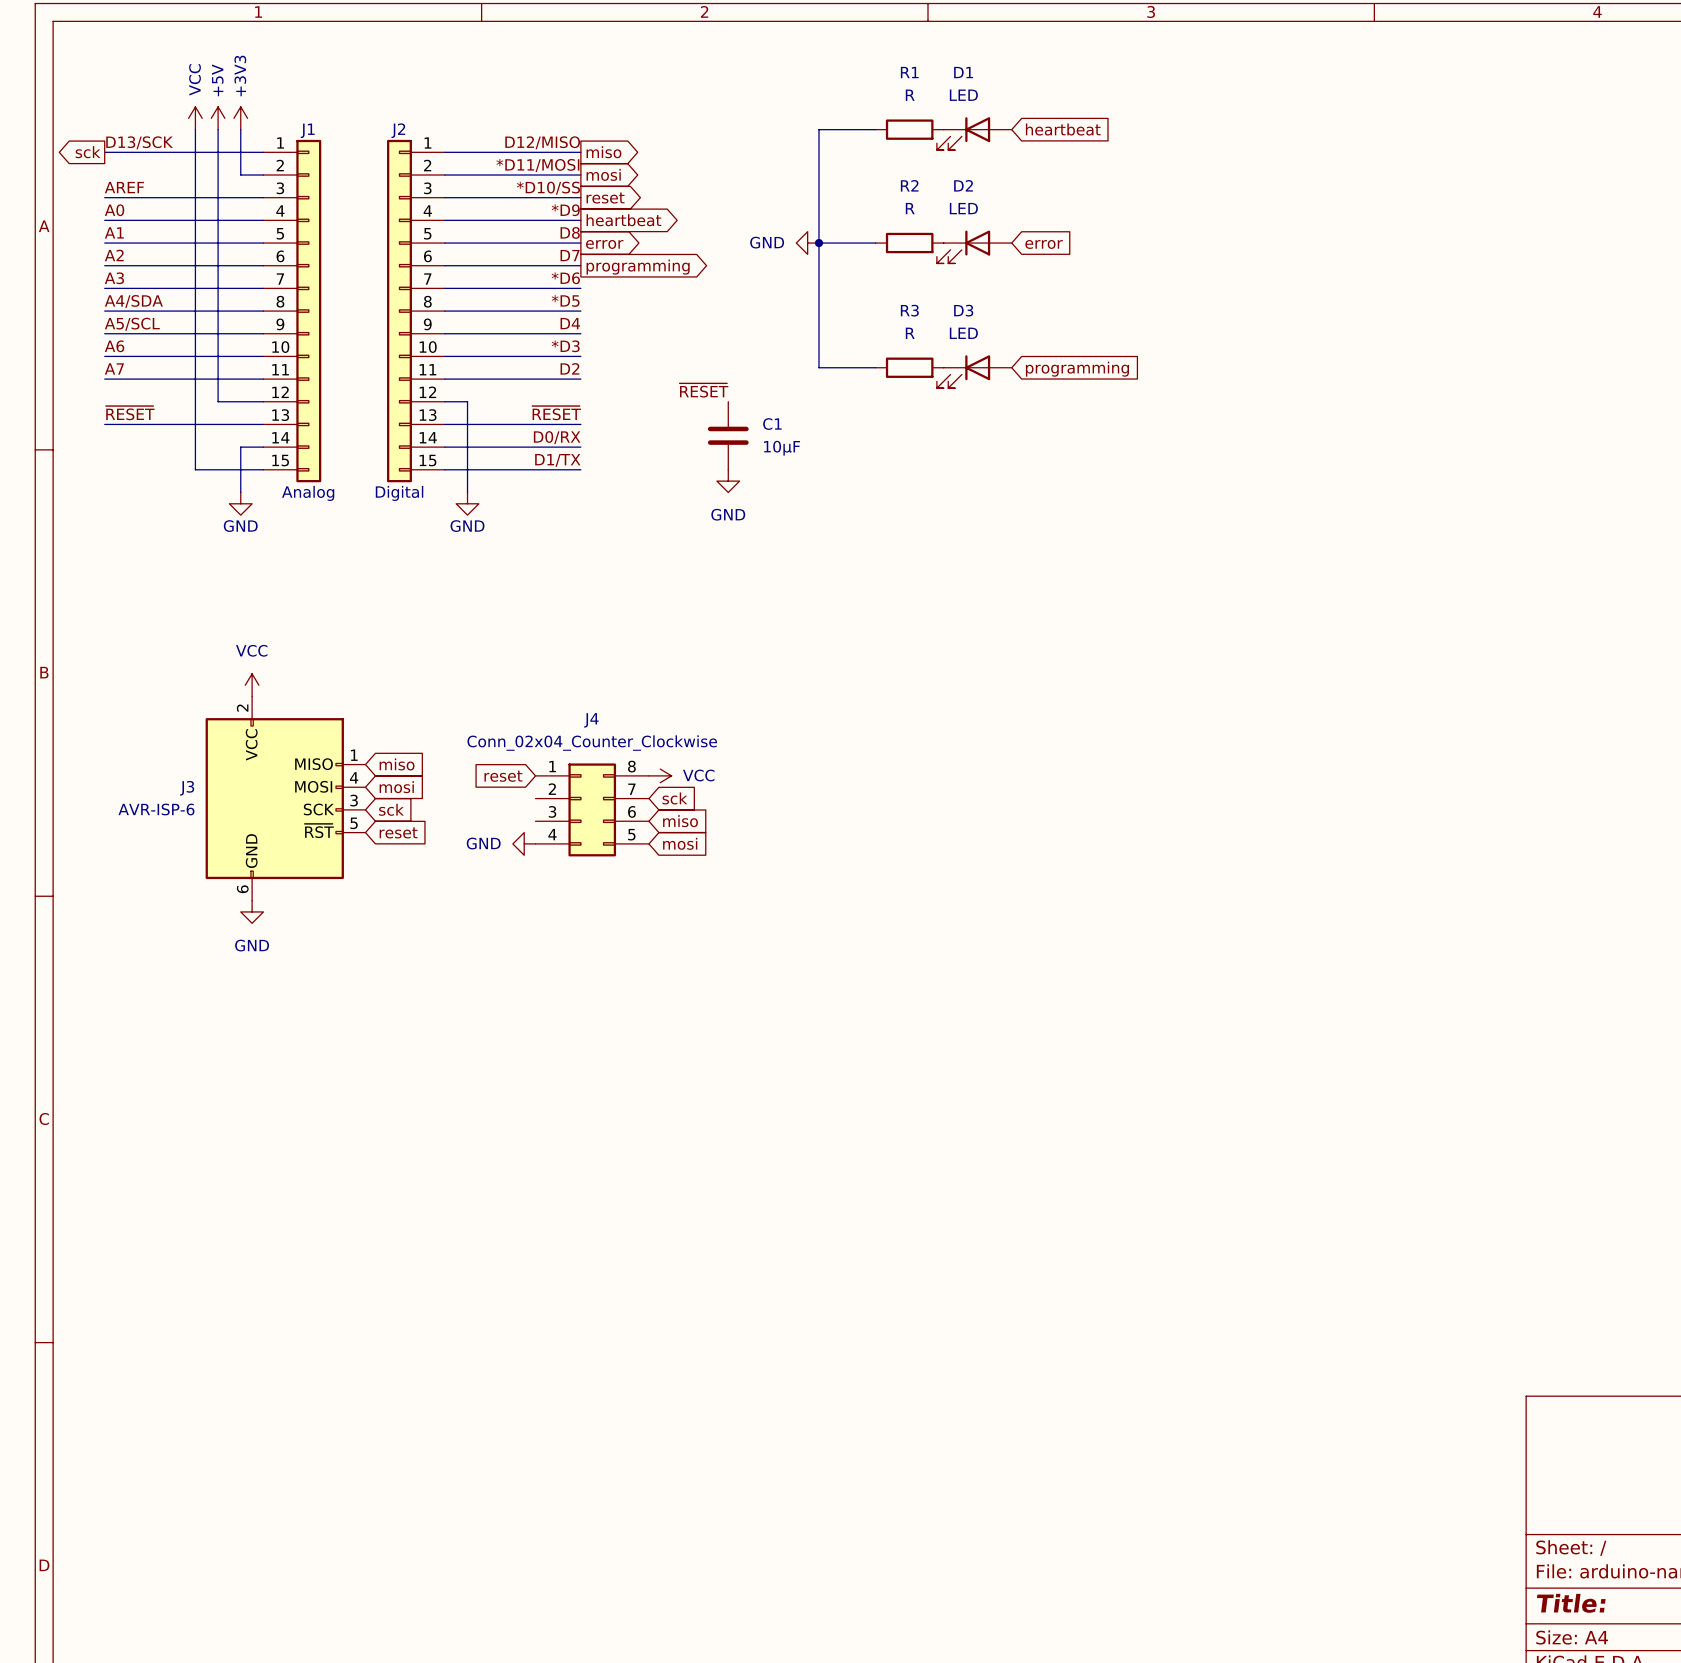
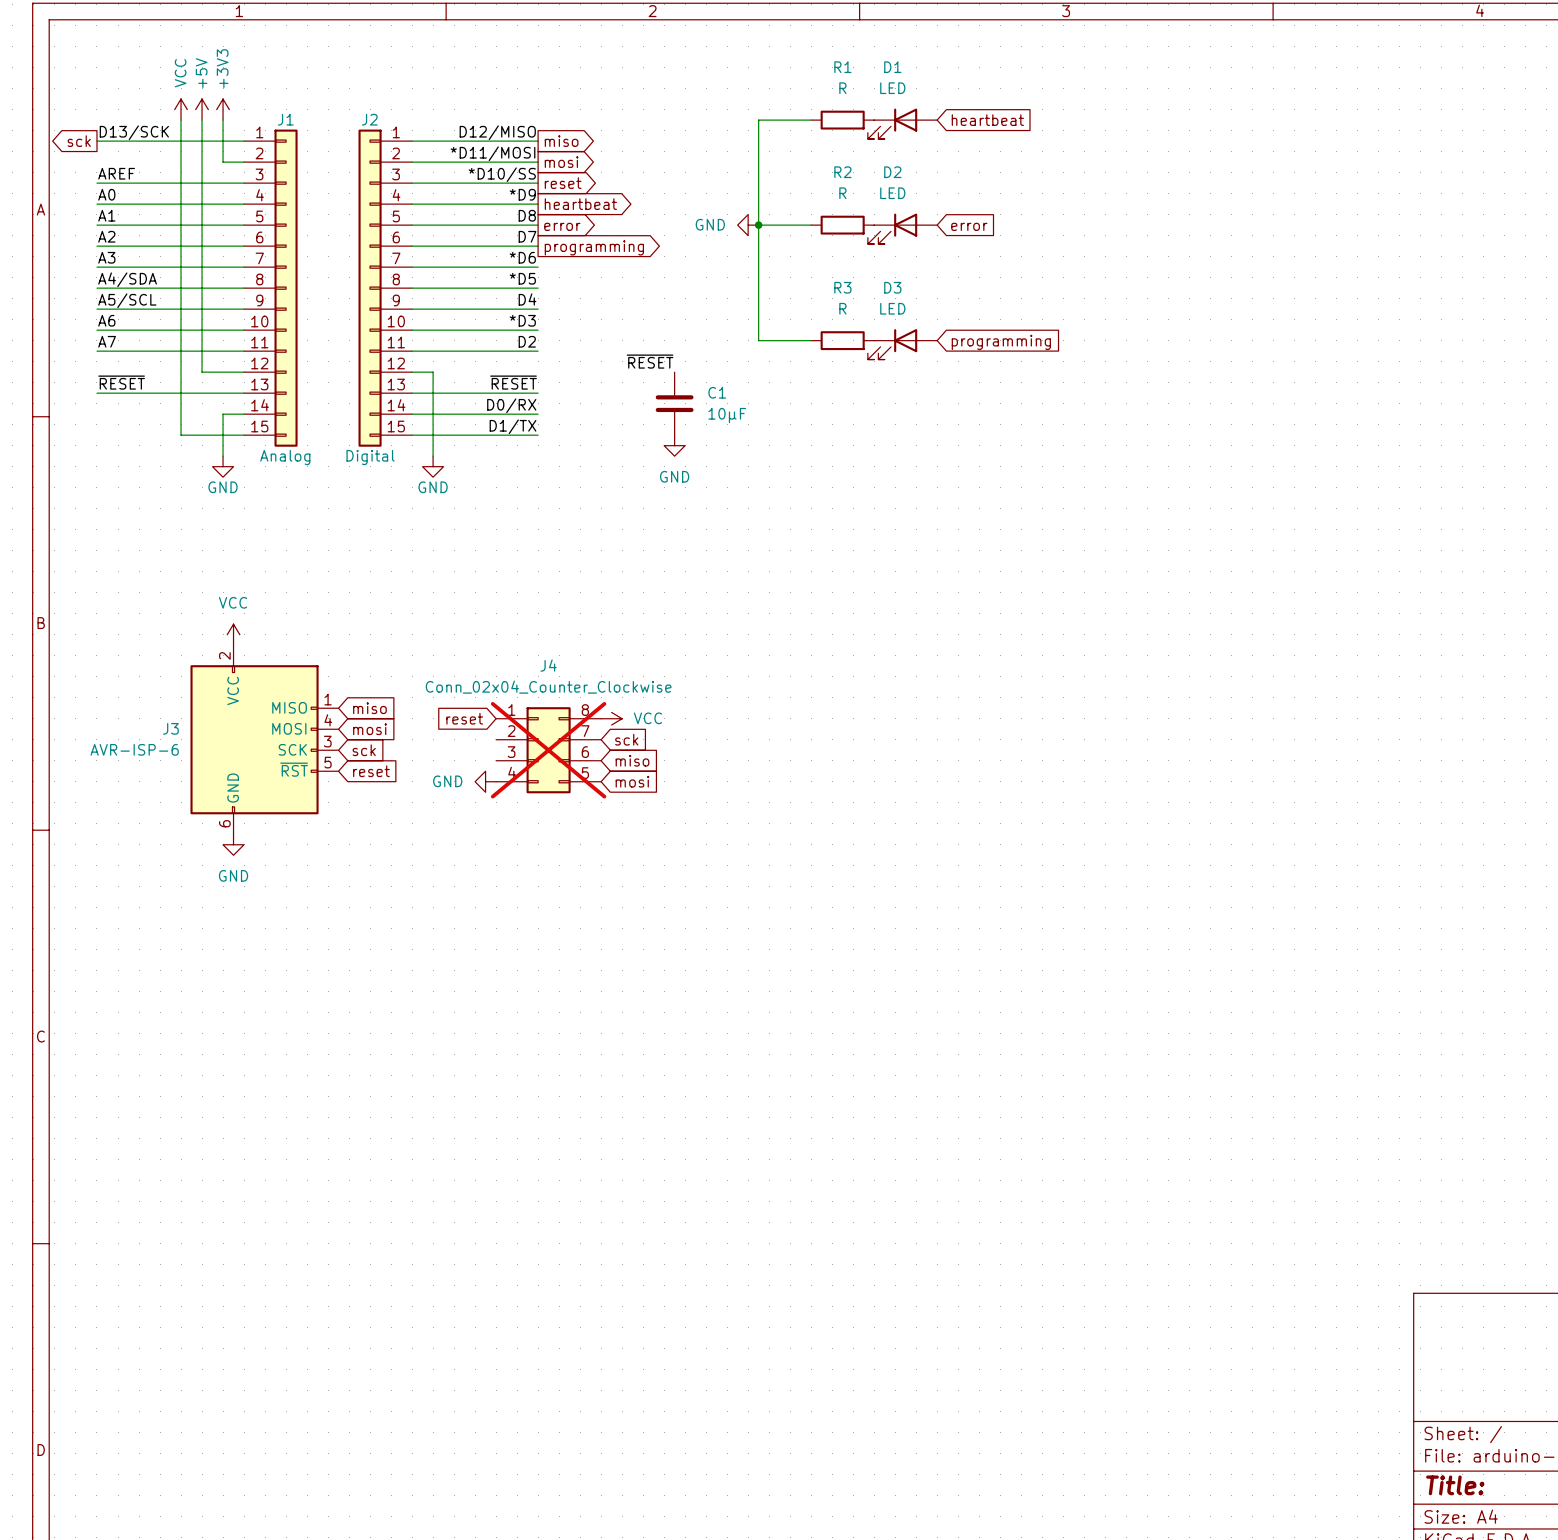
J4 do-not-place cross: none -> (548, 750)

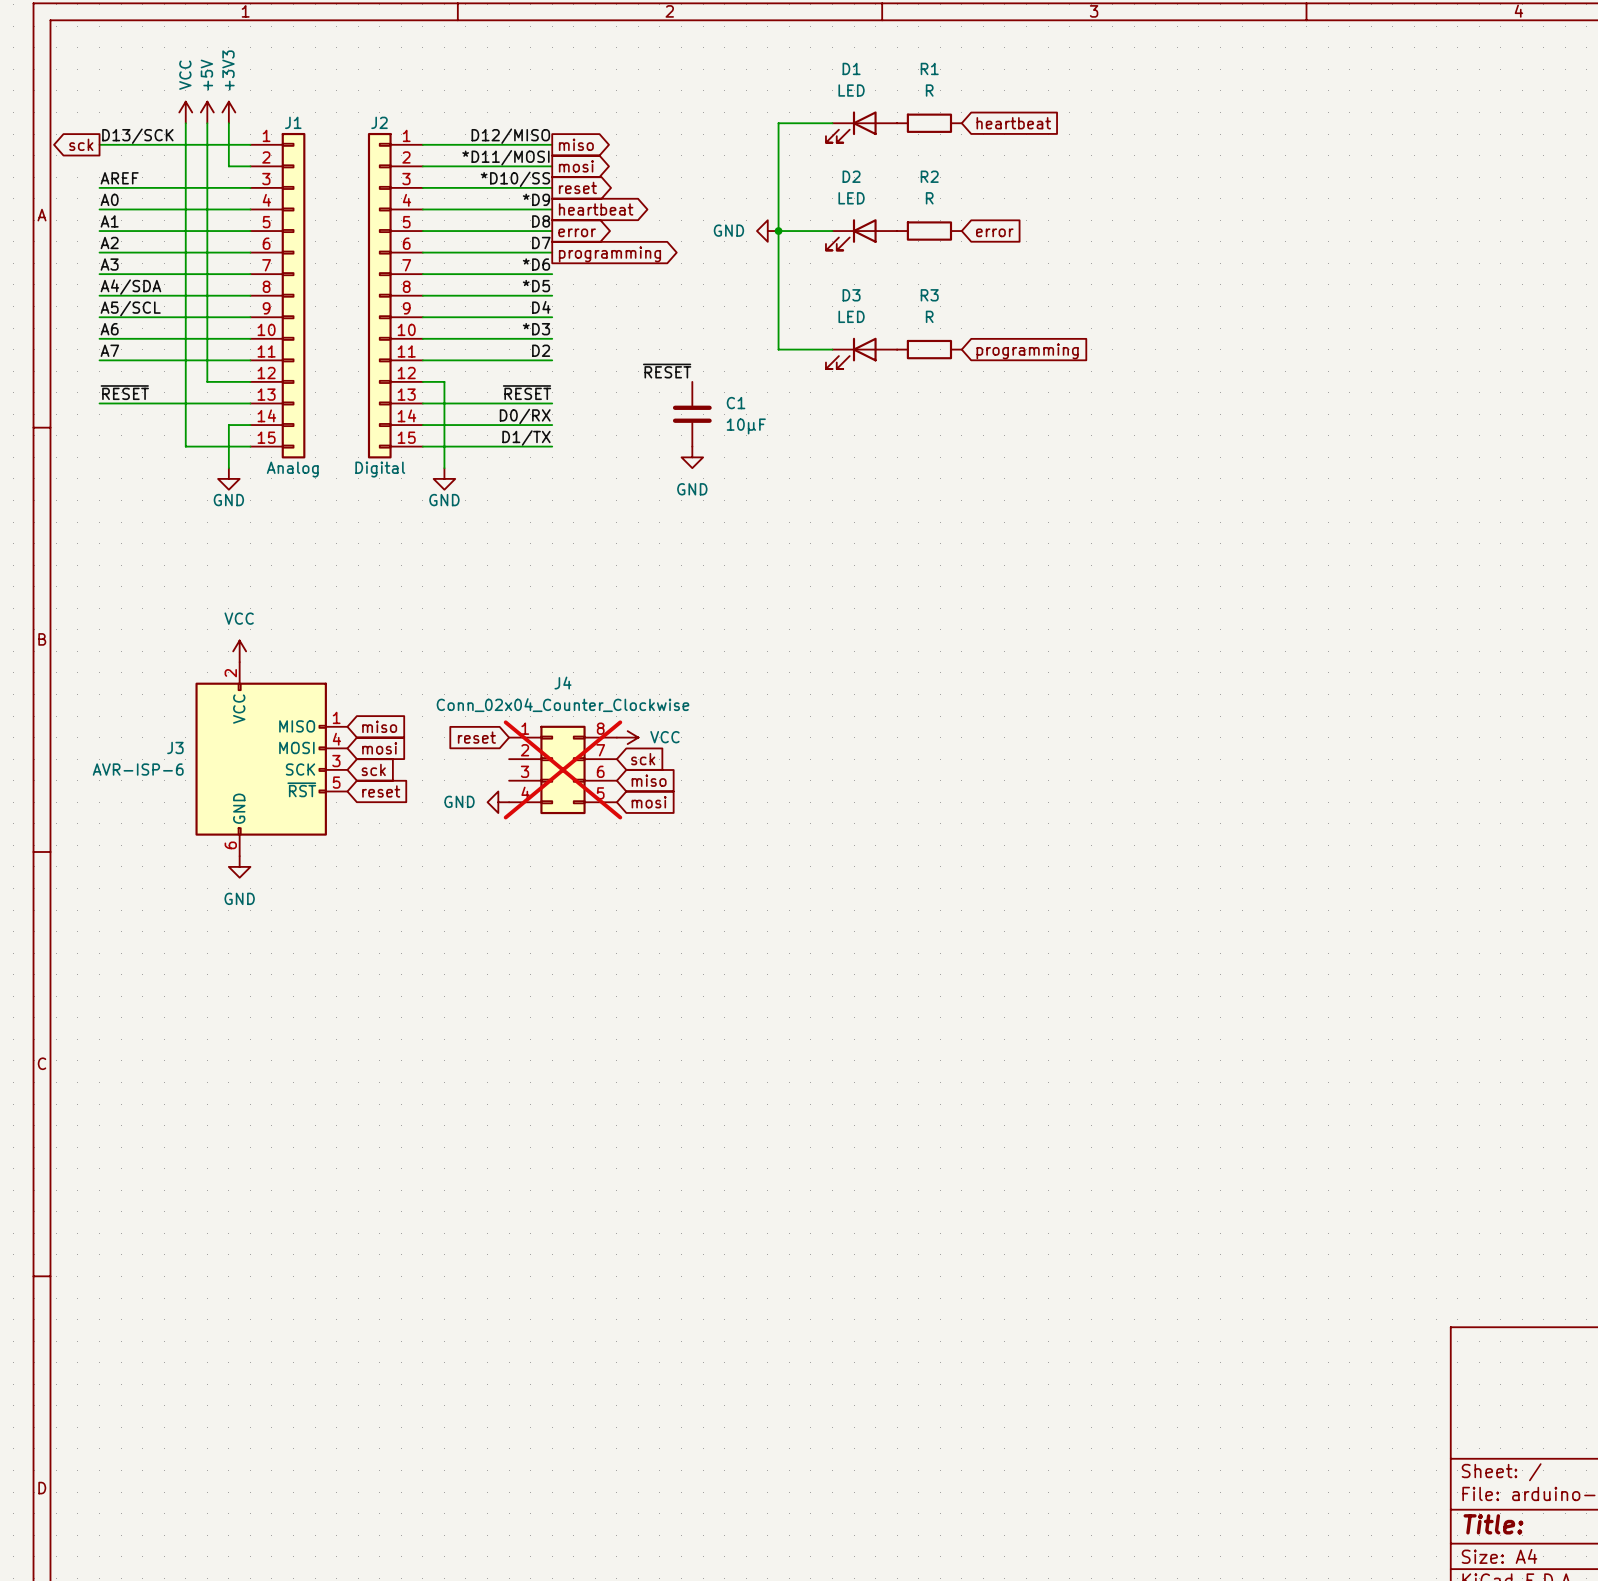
R1 position: (842, 120) -> (929, 123)
D1 position: (902, 123) -> (861, 127)
R2 position: (842, 225) -> (929, 231)
D2 position: (902, 228) -> (861, 234)
R3 position: (842, 340) -> (929, 349)
D3 position: (902, 344) -> (861, 353)

